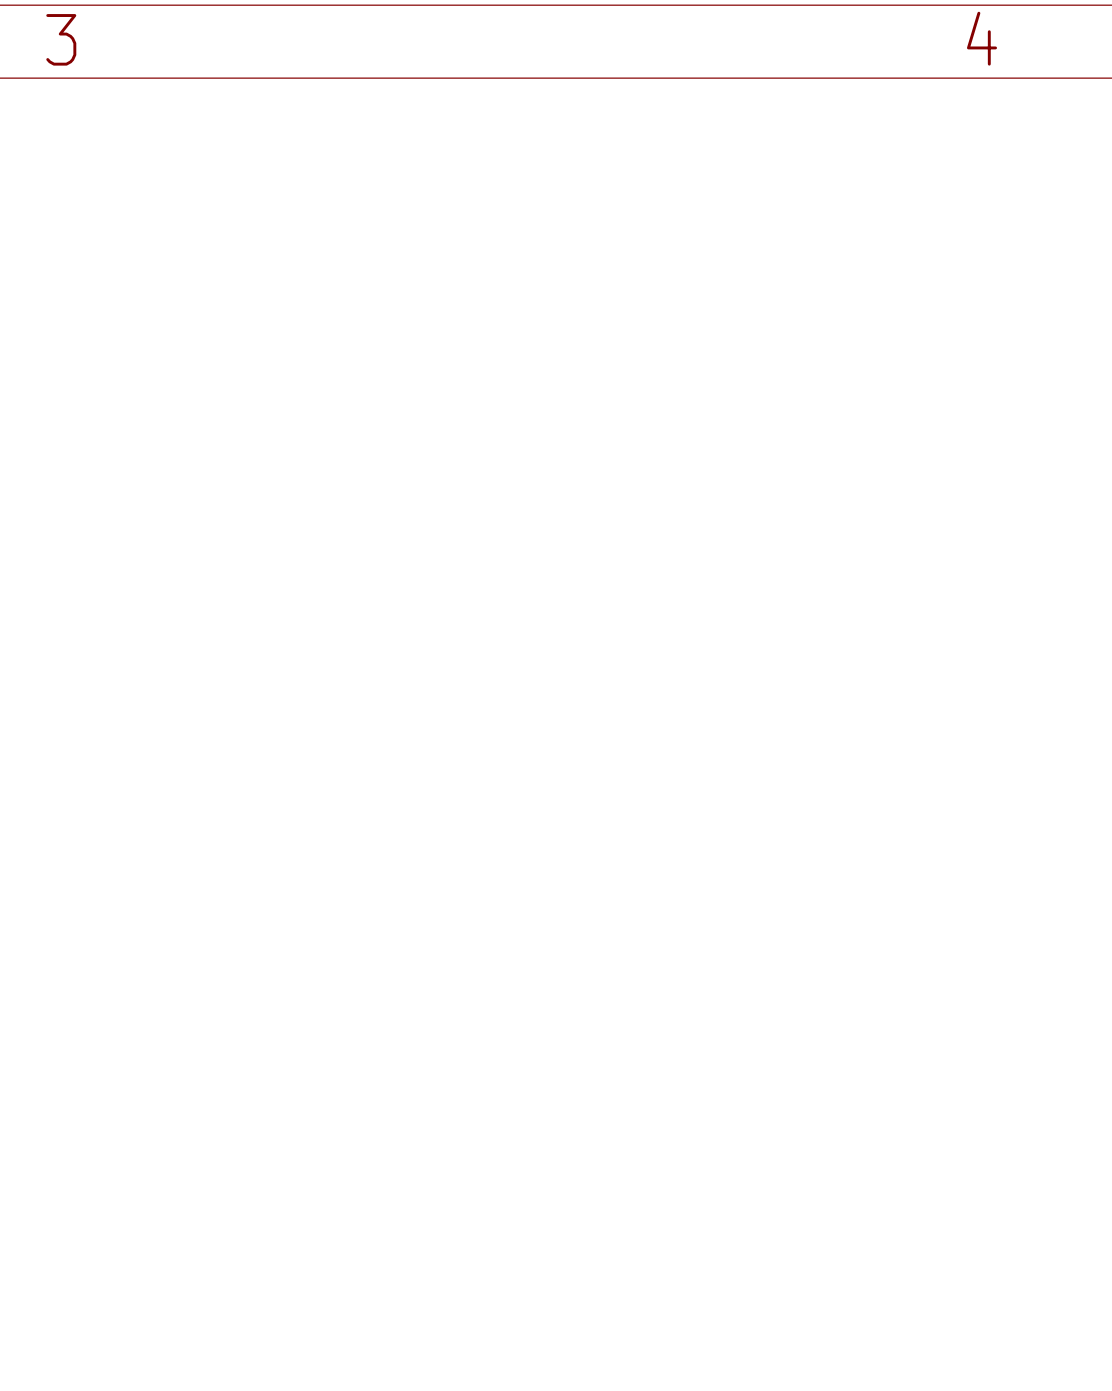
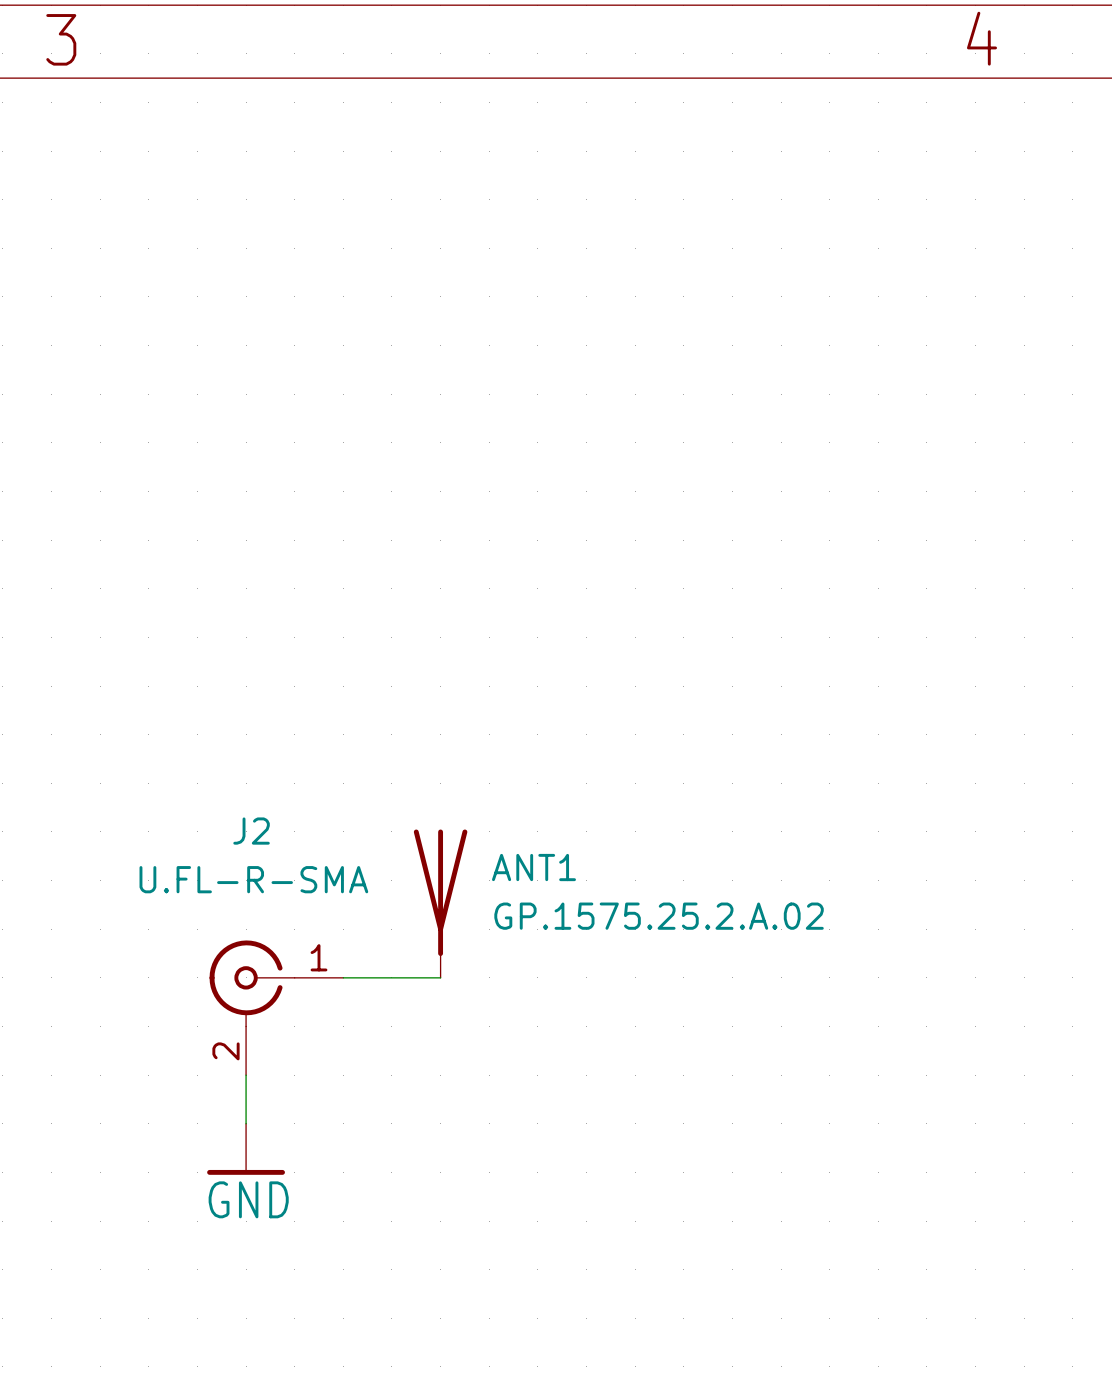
ANT1: none -> GP.1575.25.2.A.02 (440, 903)
wire: none -> (343, 977) (440, 977)
J2: none -> U.FL-R-SMA (276, 1007)
wire: none -> (246, 1075) (246, 1123)
power symbol: none -> GND (246, 1149)

